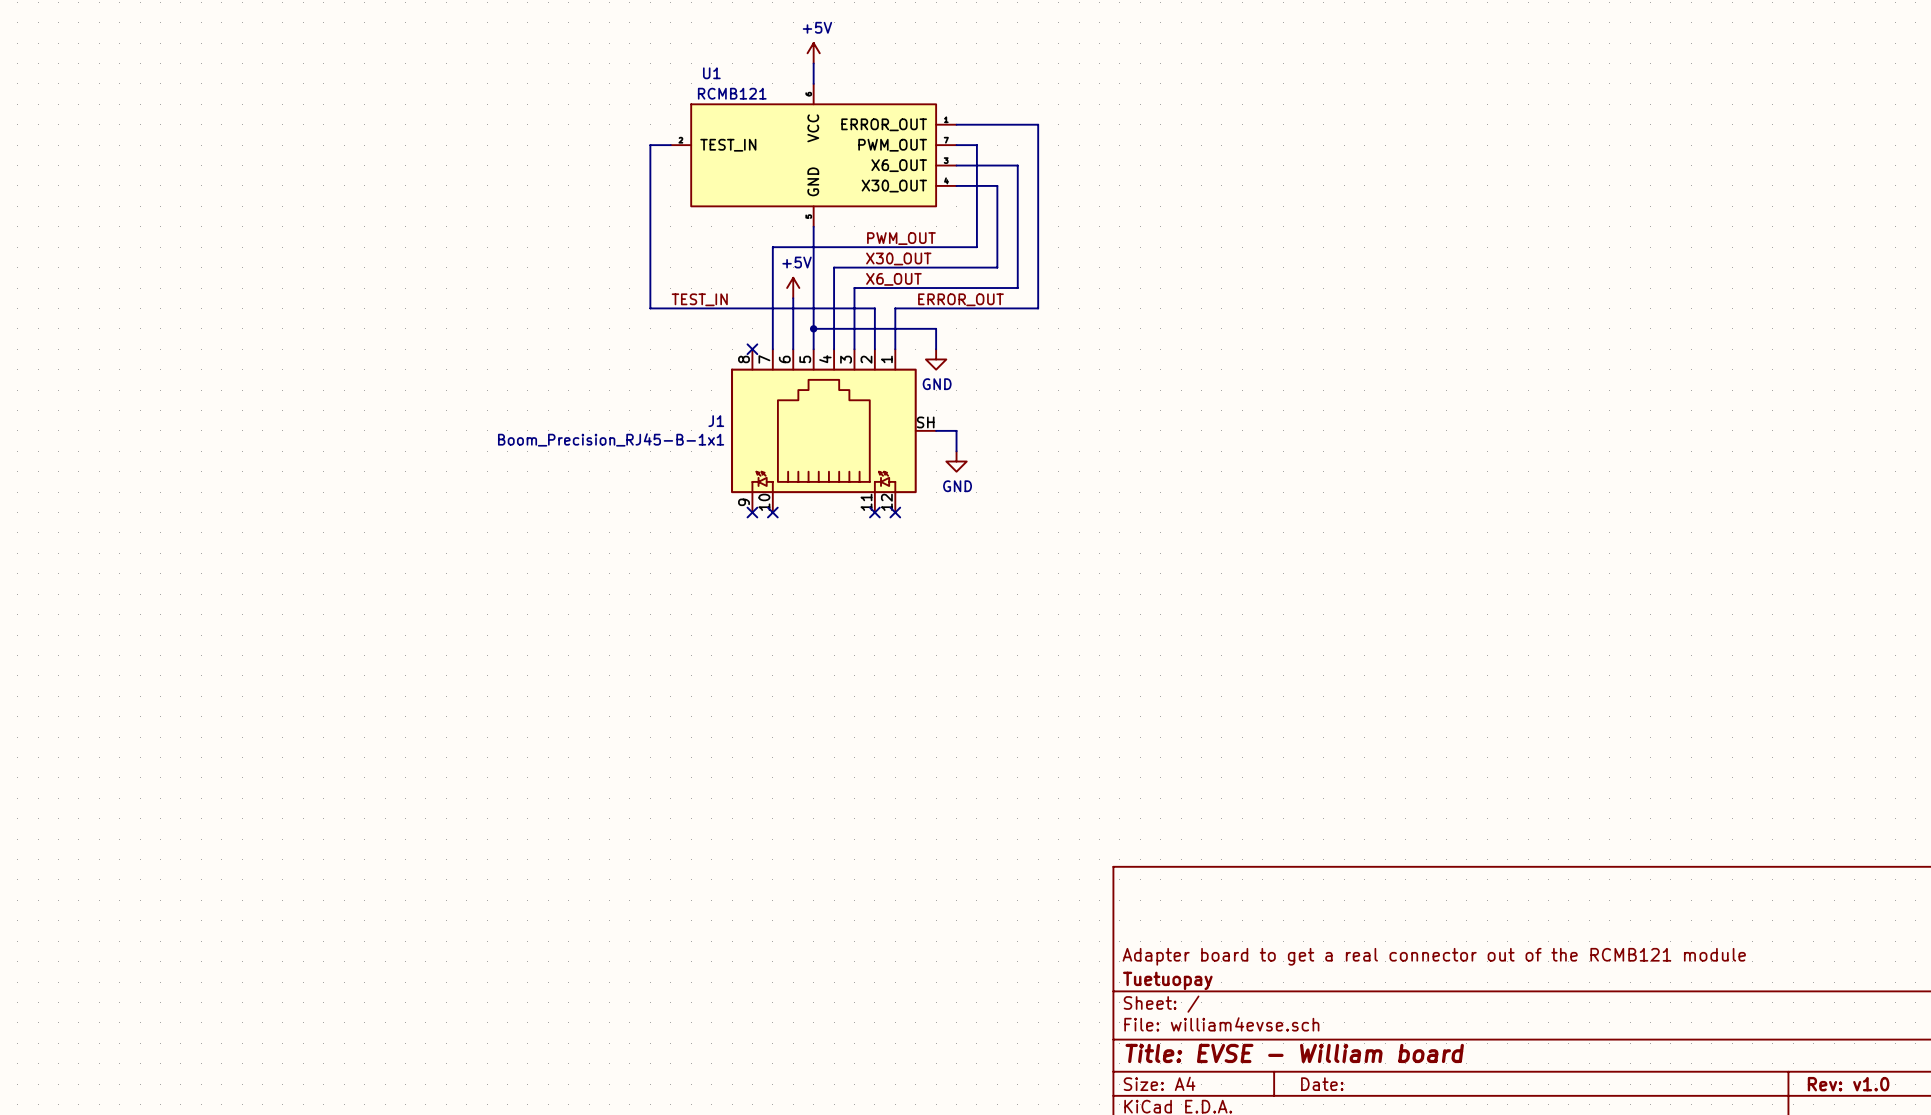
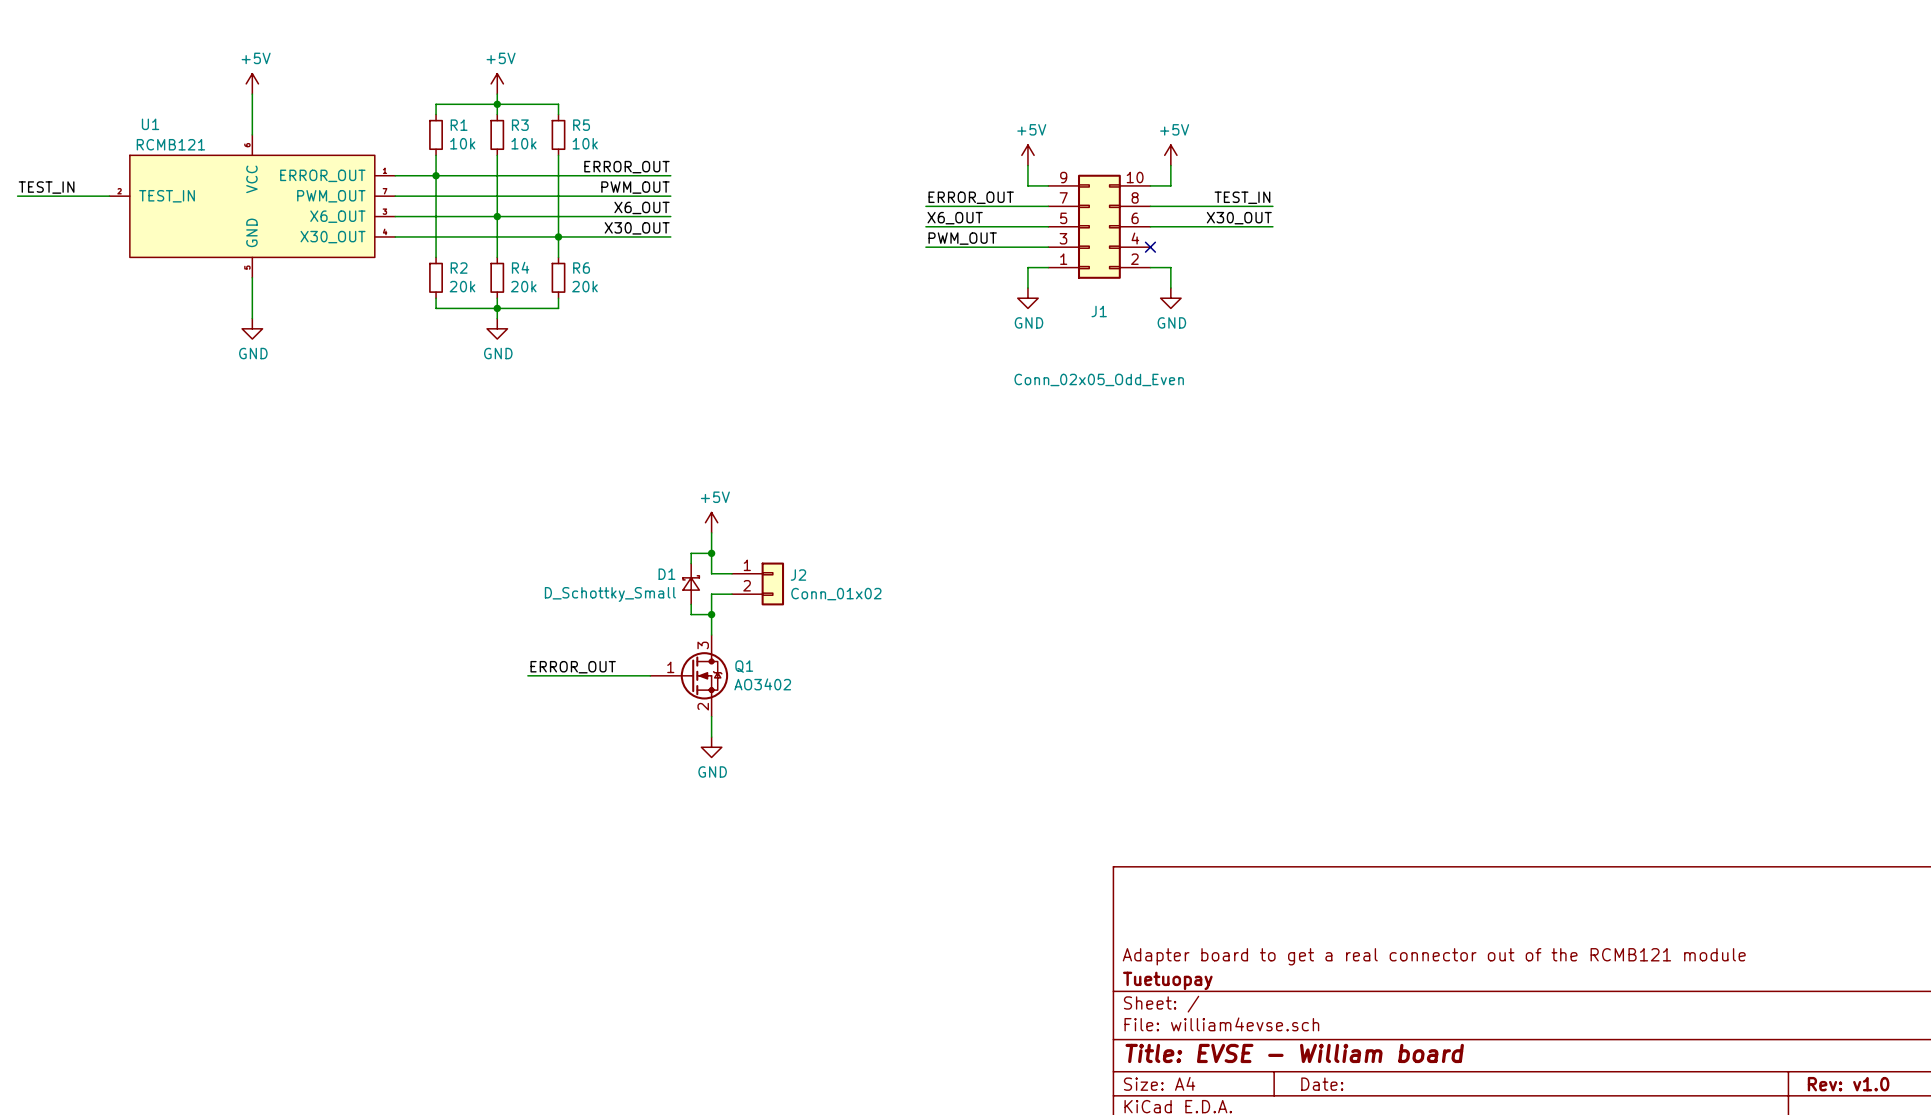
power symbol: +5V (813, 53) -> none
wire: (813, 63) (813, 83) -> none
power symbol: none -> +5V (252, 83)
power symbol: none -> +5V (497, 83)
wire: none -> (252, 94) (252, 134)
wire: none -> (497, 94) (497, 114)
junction: none -> (497, 104)
wire: none -> (436, 114) (436, 104) (558, 104) (558, 114)
wire: (956, 124) (1038, 124) (1038, 308) (895, 308) (895, 349) -> none
R1: none -> 10k (436, 134)
R3: none -> 10k (497, 134)
R5: none -> 10k (558, 134)
wire: (670, 145) (650, 145) (650, 308) (874, 308) (874, 349) -> none
wire: (956, 145) (976, 145) (976, 247) -> (1048, 247) (976, 247)
wire: none -> (436, 155) (436, 257)
wire: none -> (497, 155) (497, 257)
wire: none -> (558, 155) (558, 257)
U1 position: (813, 155) -> (252, 206)
power symbol: none -> +5V (1027, 155)
power symbol: none -> +5V (1170, 155)
wire: (956, 165) (1017, 165) (1017, 288) (854, 288) (854, 349) -> none
wire: none -> (1027, 165) (1027, 185) (1048, 185)
wire: none -> (1170, 165) (1170, 185) (1150, 185)
label: none -> ERROR_OUT (626, 167)
wire: none -> (395, 175) (670, 175)
junction: none -> (436, 175)
wire: (956, 185) (997, 185) (997, 267) (834, 267) (834, 349) -> none
label: none -> TEST_IN (46, 187)
label: none -> PWM_OUT (635, 187)
wire: none -> (17, 196) (109, 196)
wire: none -> (395, 196) (670, 196)
label: none -> TEST_IN (1242, 197)
wire: none -> (925, 206) (1048, 206)
wire: none -> (1150, 206) (1272, 206)
label: none -> X6_OUT (642, 207)
wire: none -> (395, 216) (670, 216)
junction: none -> (497, 216)
label: none -> X30_OUT (1239, 218)
wire: (813, 226) (813, 349) -> none
wire: none -> (925, 226) (1048, 226)
wire: none -> (1150, 226) (1272, 226)
wire: none -> (395, 236) (670, 236)
junction: none -> (558, 236)
label position: PWM_OUT (901, 238) -> PWM_OUT (962, 238)
wire: (925, 247) (772, 247) (772, 349) -> none
no-connect mark: none -> (1150, 247)
label position: X30_OUT (898, 258) -> X30_OUT (637, 228)
wire: none -> (1048, 267) (1027, 267) (1027, 288)
wire: none -> (1150, 267) (1170, 267) (1170, 288)
wire: none -> (252, 277) (252, 318)
R2: none -> 20k (436, 277)
R4: none -> 20k (497, 277)
R6: none -> 20k (558, 277)
label position: X6_OUT (893, 279) -> X6_OUT (955, 218)
power symbol: +5V (793, 288) -> none
wire: none -> (436, 298) (436, 308) (558, 308) (558, 298)
wire: none -> (497, 298) (497, 318)
wire: (793, 298) (793, 349) -> none
power symbol: none -> GND (1027, 298)
power symbol: none -> GND (1170, 298)
label: TEST_IN (699, 299) -> none
label position: ERROR_OUT (960, 299) -> ERROR_OUT (971, 197)
junction: none -> (497, 308)
power symbol: none -> GND (252, 328)
power symbol: none -> GND (497, 328)
wire: (813, 328) (936, 328) (936, 349) -> none
junction: (813, 328) -> none
J1 symbol: [730, 349, 937, 513] -> [1048, 174, 1151, 279]
no-connect mark: (752, 349) -> none
power symbol: GND (936, 359) -> none
J1 name position: J1 (716, 421) -> J1 (1099, 311)
wire: (936, 430) (956, 430) (956, 451) -> none
J1 value: Boom_Precision_RJ45-B-1x1 (611, 439) -> Conn_02x05_Odd_Even (1099, 379)
power symbol: GND (956, 461) -> none
no-connect mark: (752, 512) -> none
no-connect mark: (772, 512) -> none
no-connect mark: (874, 512) -> none
no-connect mark: (895, 512) -> none
power symbol: none -> +5V (711, 522)
wire: none -> (711, 532) (711, 573) (732, 573)
wire: none -> (711, 553) (691, 553) (691, 563)
junction: none -> (711, 553)
D1: none -> D_Schottky_Small (691, 583)
J2: none -> Conn_01x02 (758, 583)
wire: none -> (732, 594) (711, 594) (711, 635)
wire: none -> (691, 604) (691, 614) (711, 614)
junction: none -> (711, 614)
label: none -> ERROR_OUT (573, 667)
wire: none -> (527, 675) (650, 675)
Q1: none -> AO3402 (689, 675)
wire: none -> (711, 716) (711, 737)
power symbol: none -> GND (711, 747)

